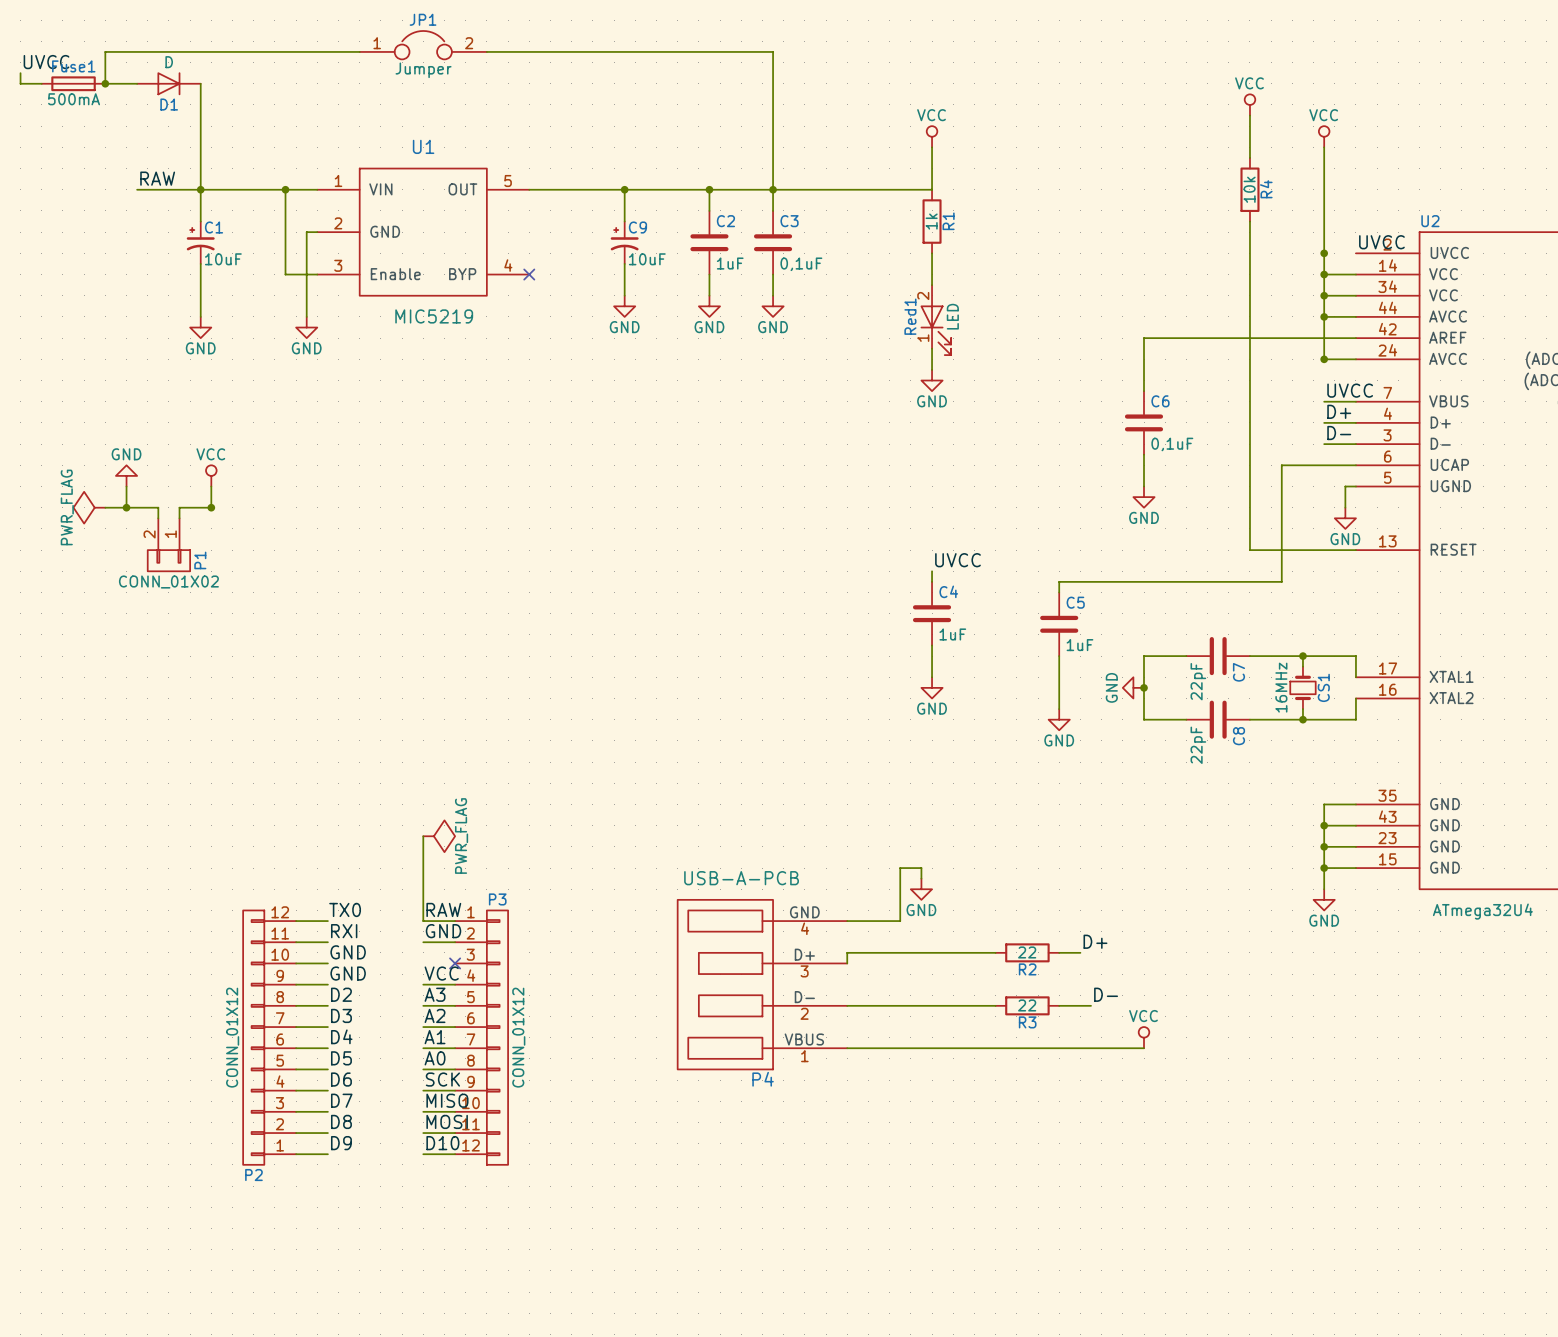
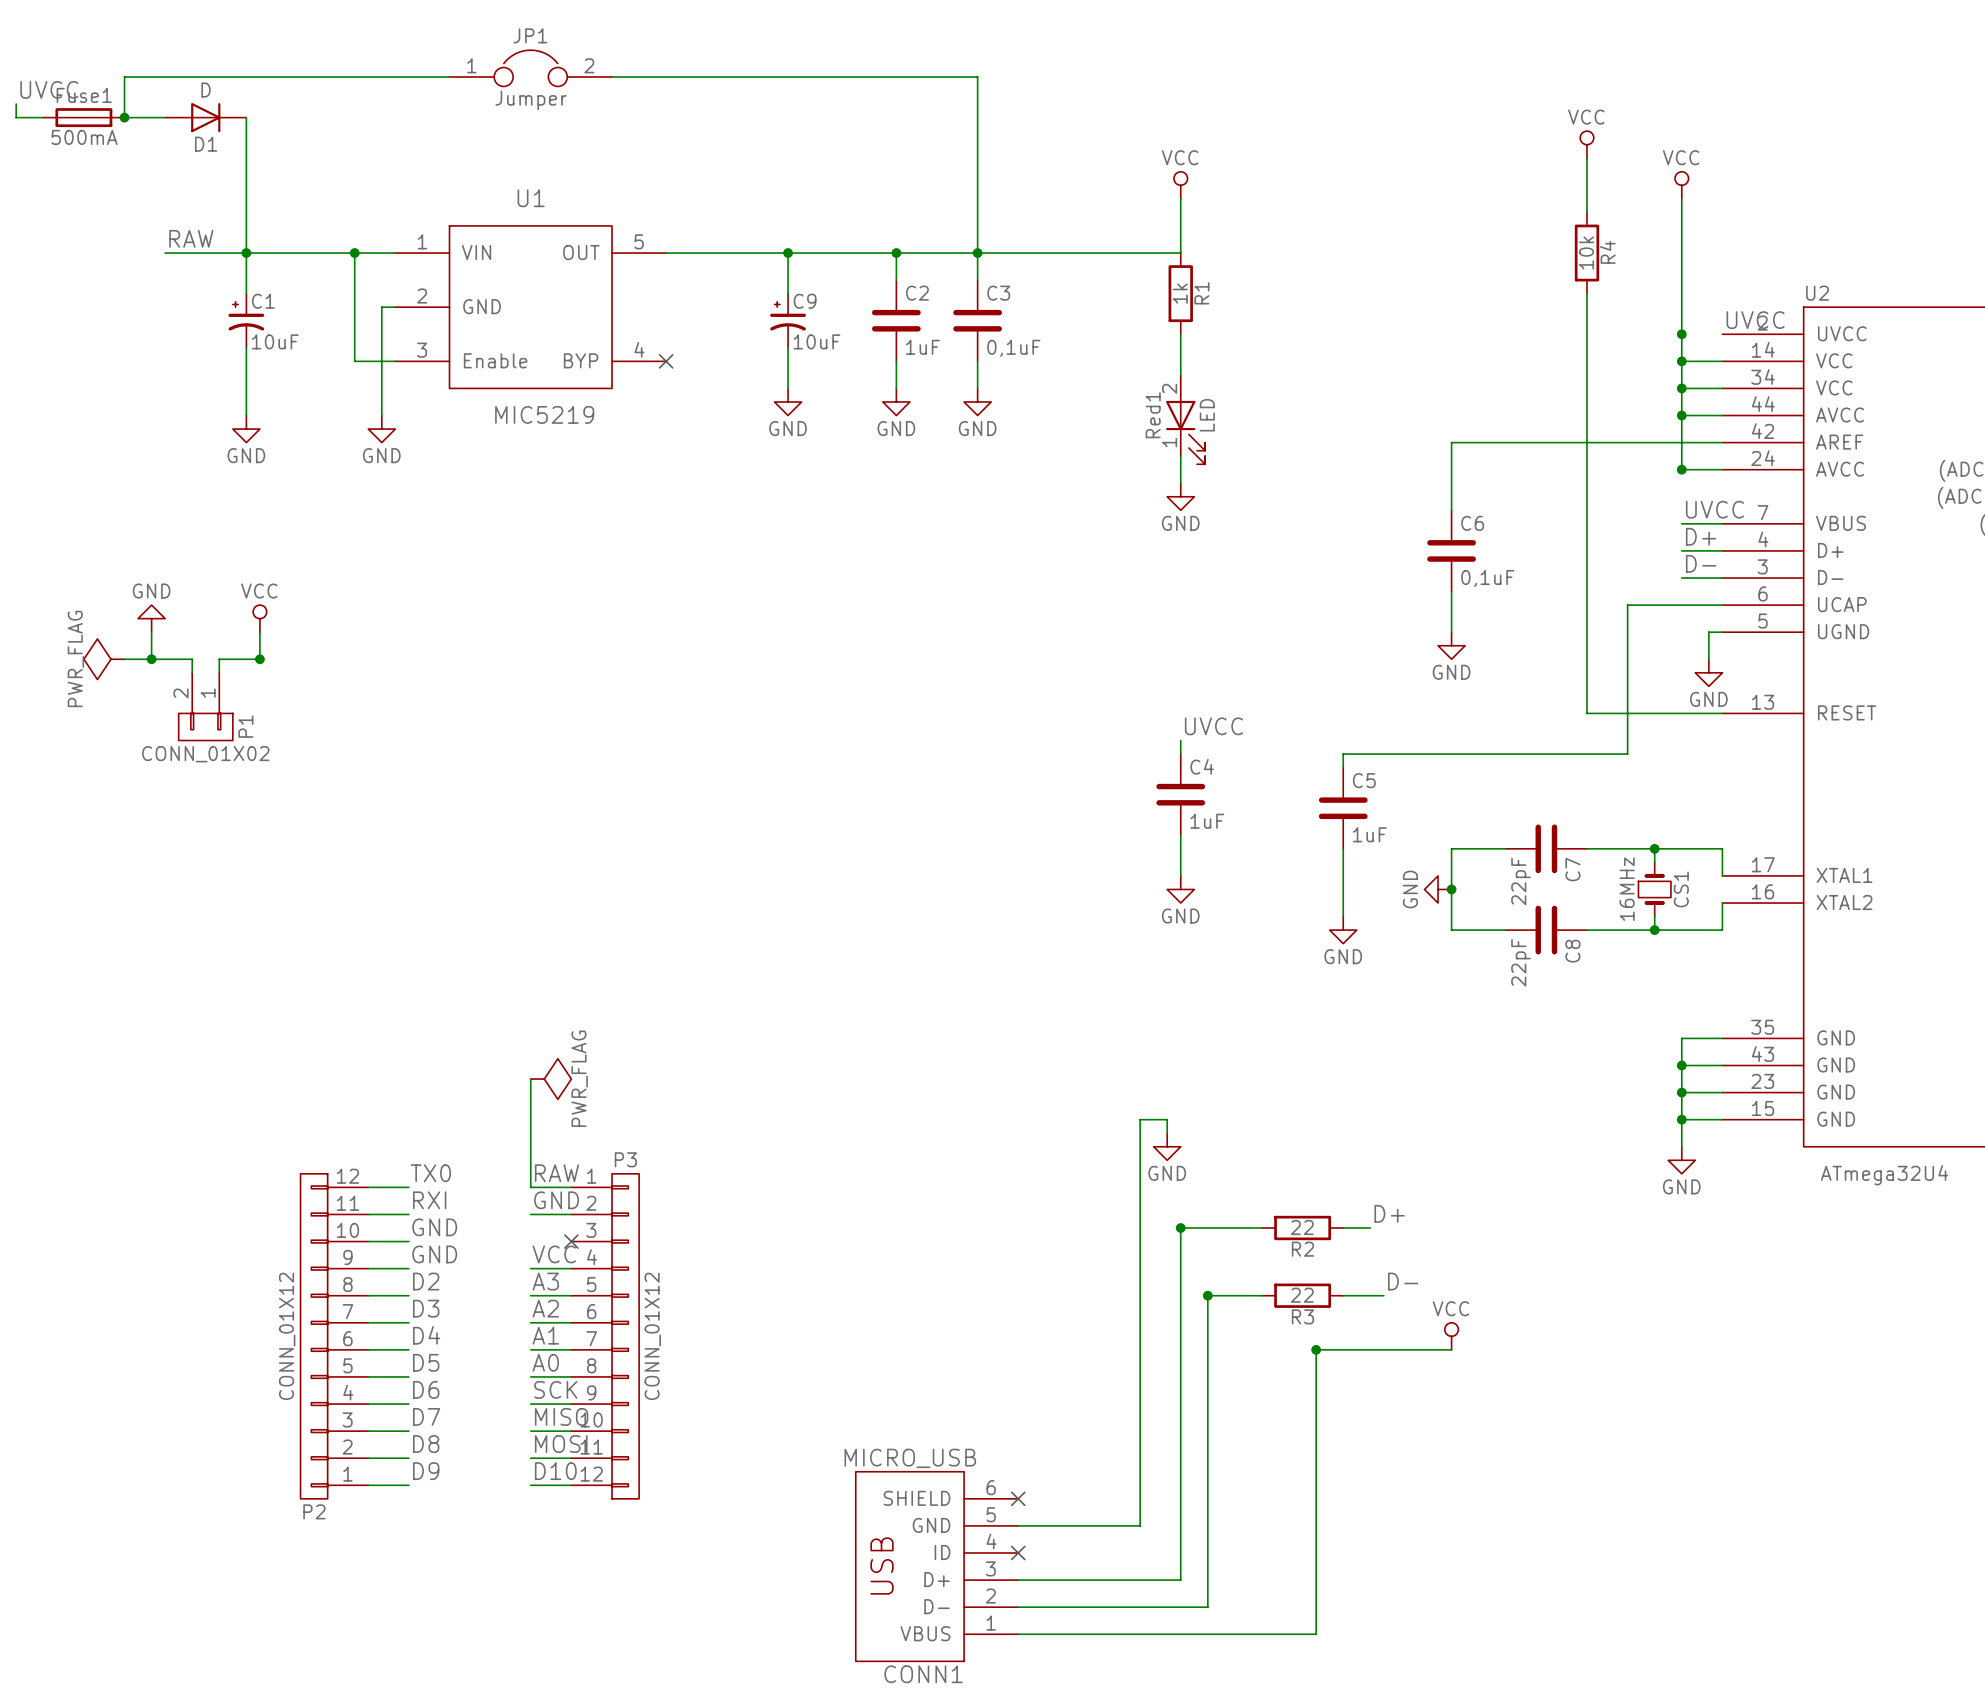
wire: (847, 921) (900, 921) -> (1018, 1525) (1140, 1525) (1140, 1187)
wire: (932, 952) (847, 952) (847, 963) -> (1180, 1228) (1180, 1580) (1018, 1580)
junction: none -> (1180, 1228)
P4: USB-A-PCB (762, 984) -> none
wire: (847, 1005) (953, 1005) -> (1018, 1607) (1207, 1607) (1207, 1295)
junction: none -> (1207, 1295)
wire: (847, 1048) (1038, 1048) -> (1018, 1634) (1316, 1634) (1316, 1349)
junction: none -> (1316, 1349)
no-connect mark: none -> (1018, 1498)
no-connect mark: none -> (1018, 1553)
CONN1: none -> MICRO_USB (937, 1566)

